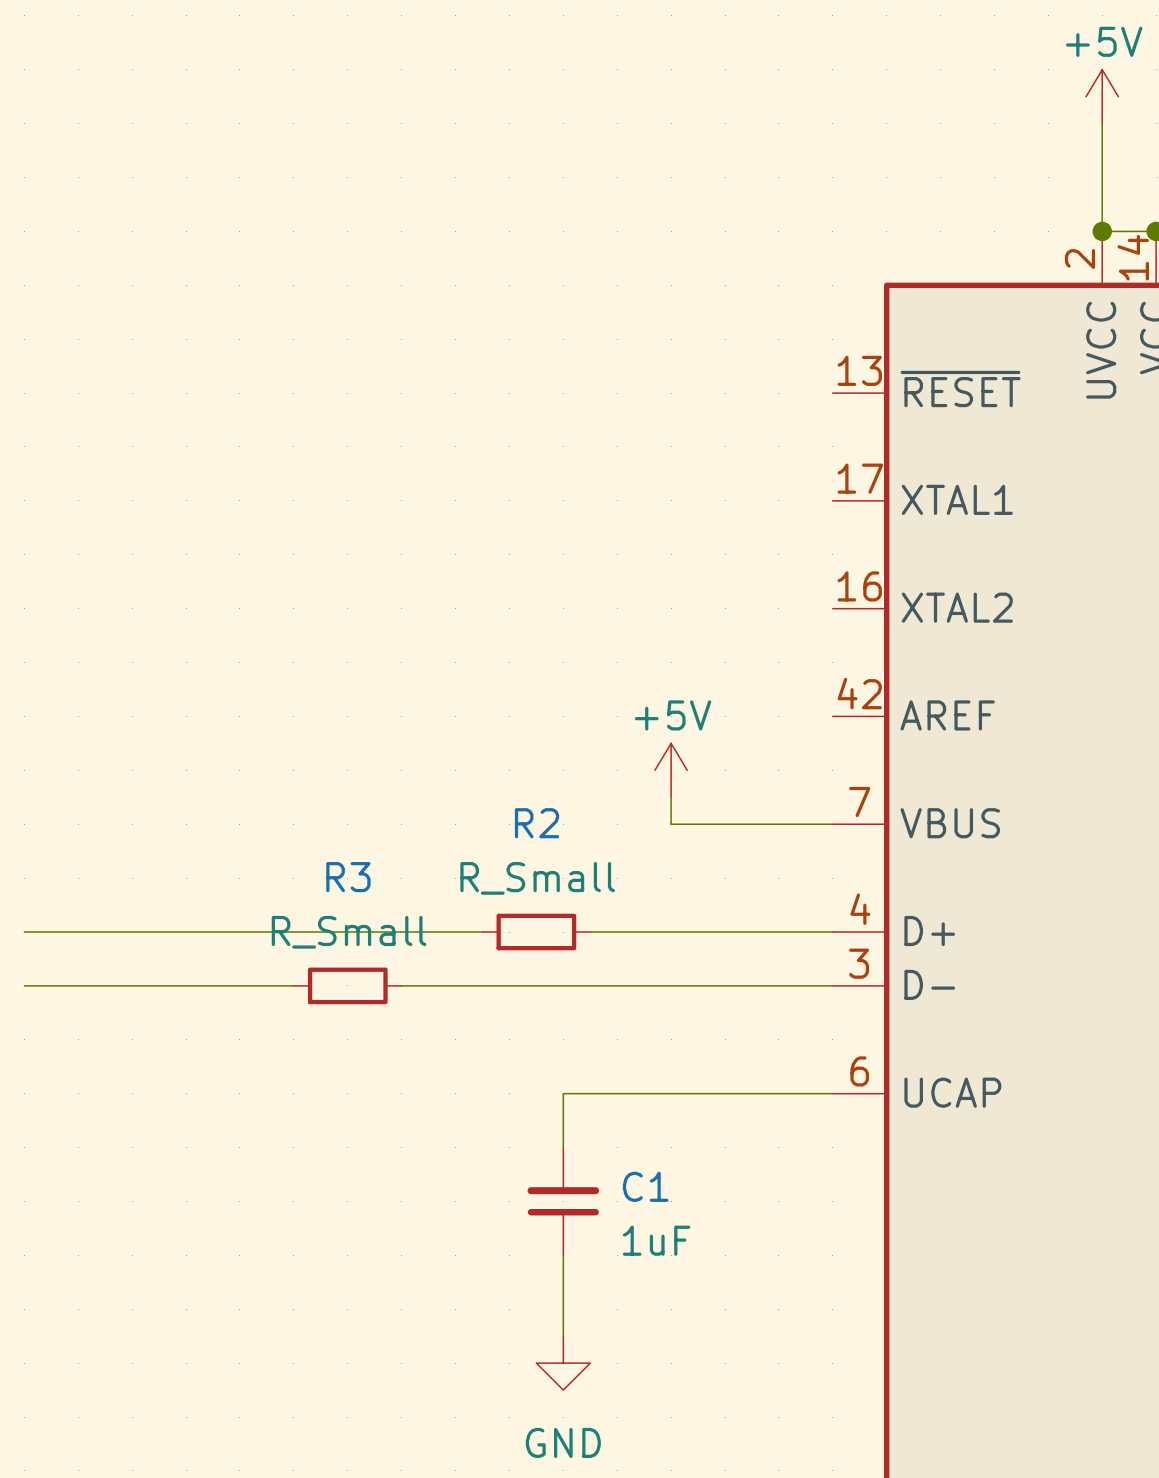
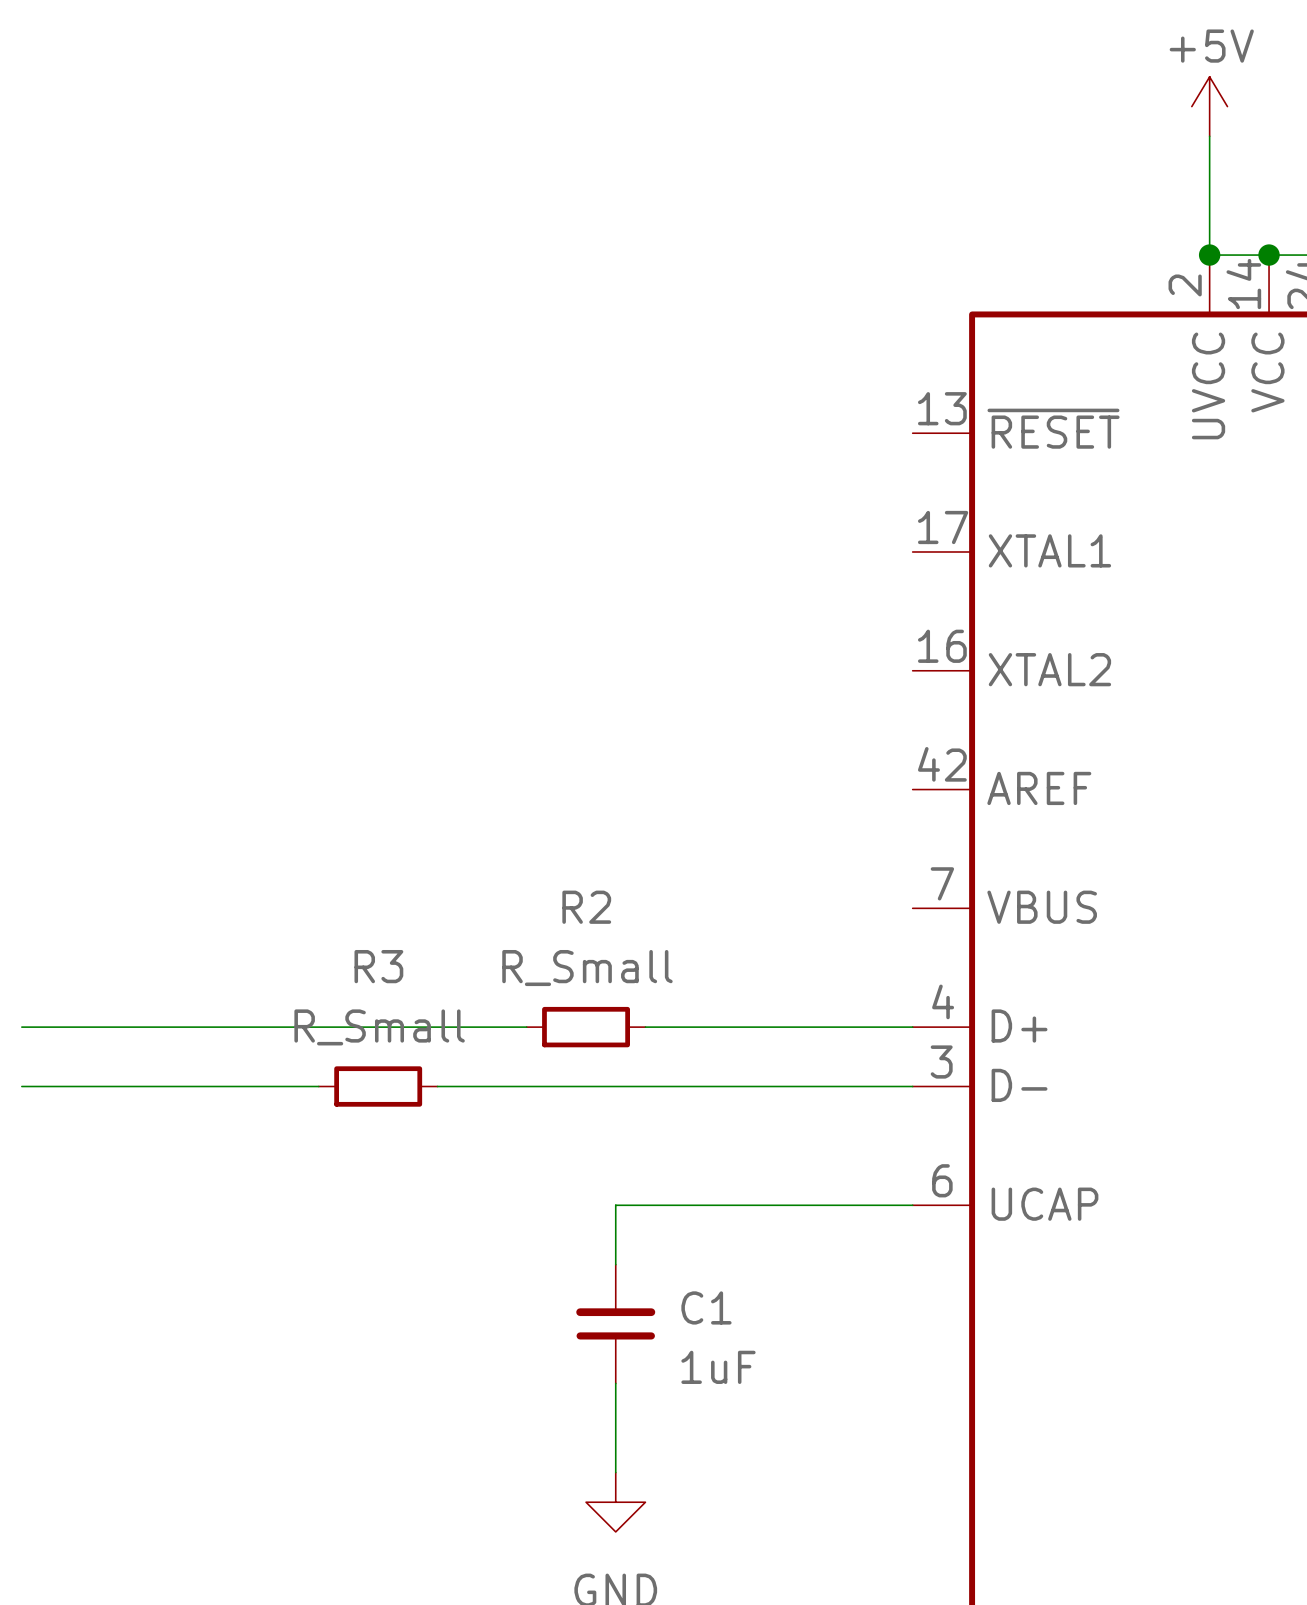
power symbol: +5V (671, 770) -> none
wire: (671, 797) (671, 824) (832, 824) -> none

